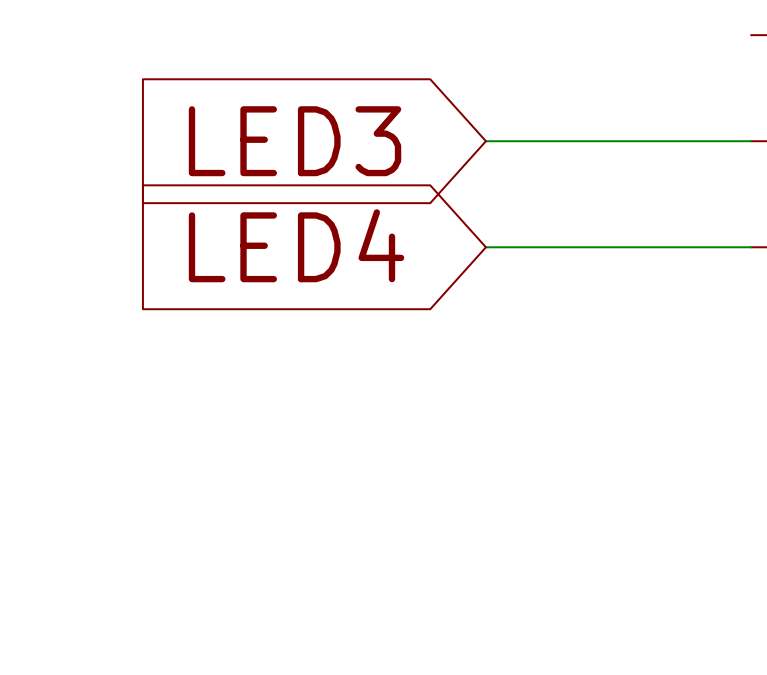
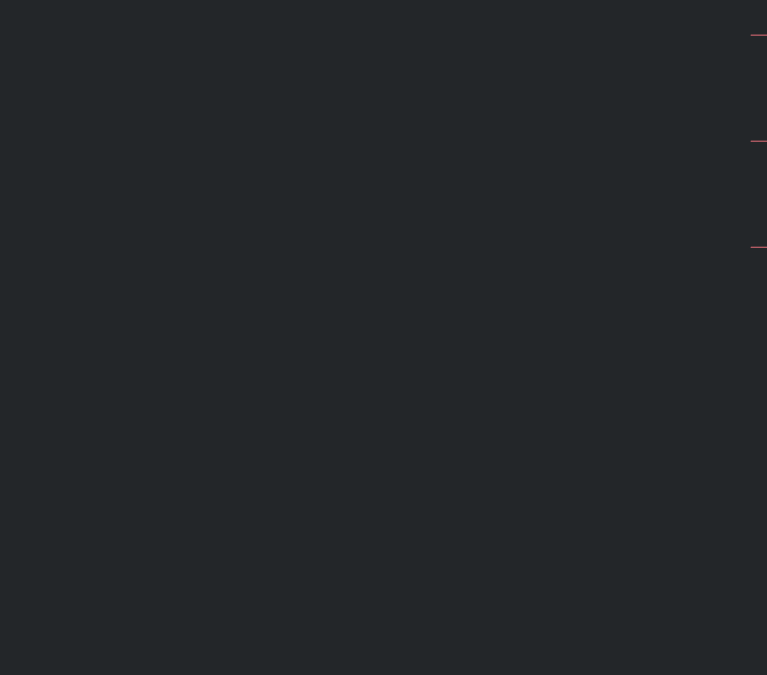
global label: LED3 (295, 141) -> none
wire: (485, 141) (751, 141) -> none
global label: LED4 (296, 245) -> none
wire: (485, 247) (751, 247) -> none

